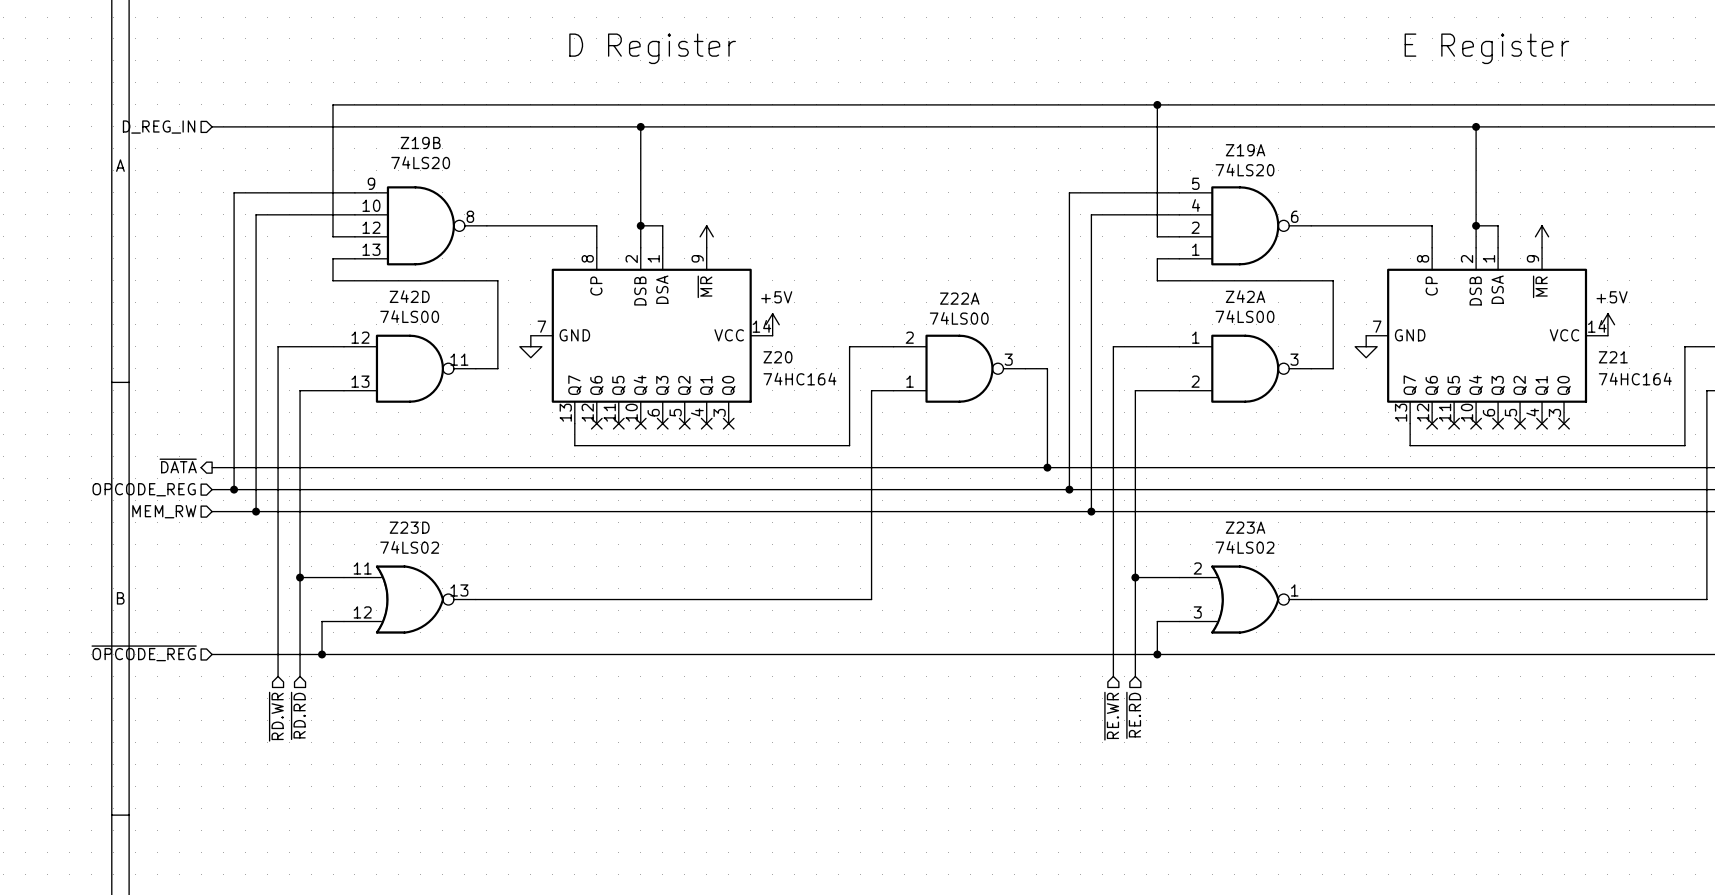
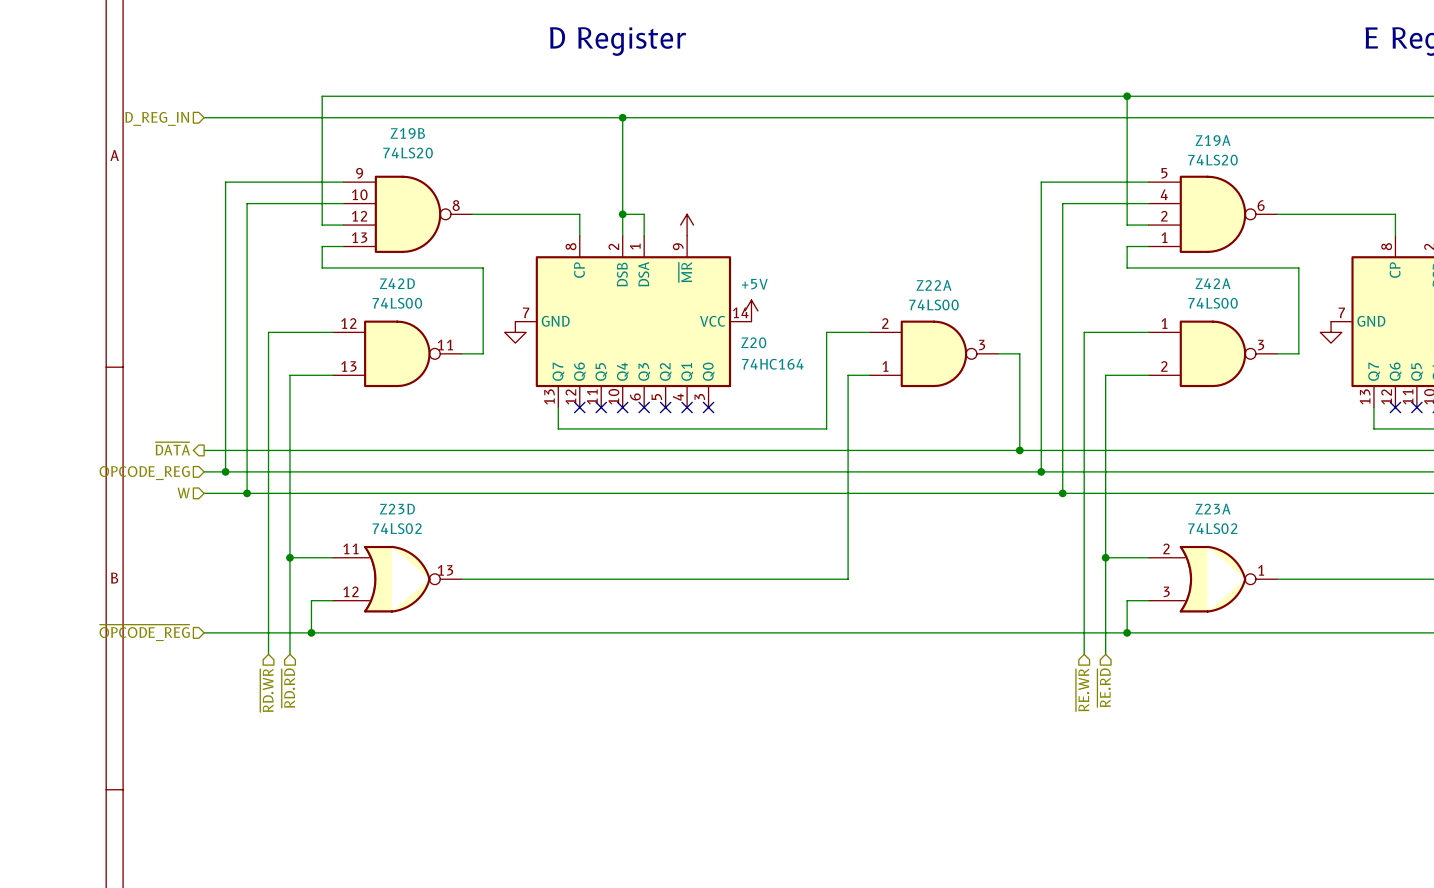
hierarchical label: MEM_RW (164, 511) -> W (183, 492)

